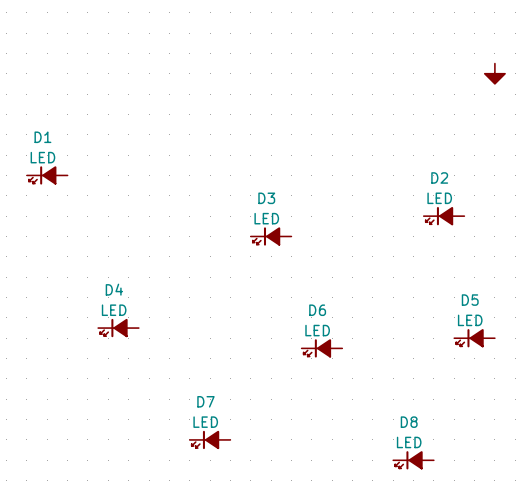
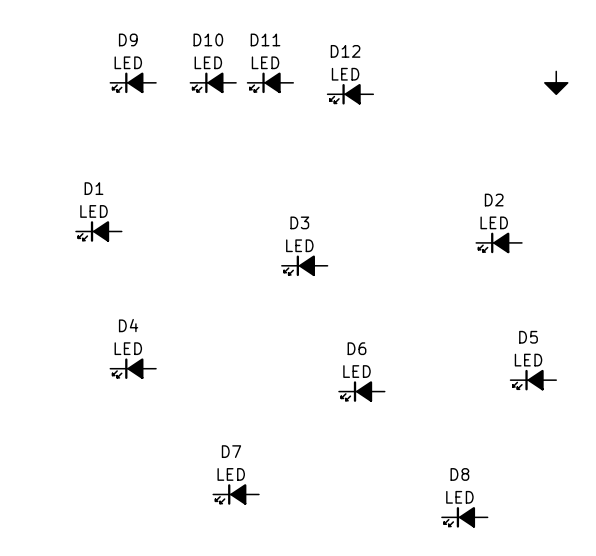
D9: none -> LED (133, 82)
D10: none -> LED (213, 82)
D11: none -> LED (270, 82)
D12: none -> LED (350, 94)
D1 position: (47, 175) -> (98, 231)

